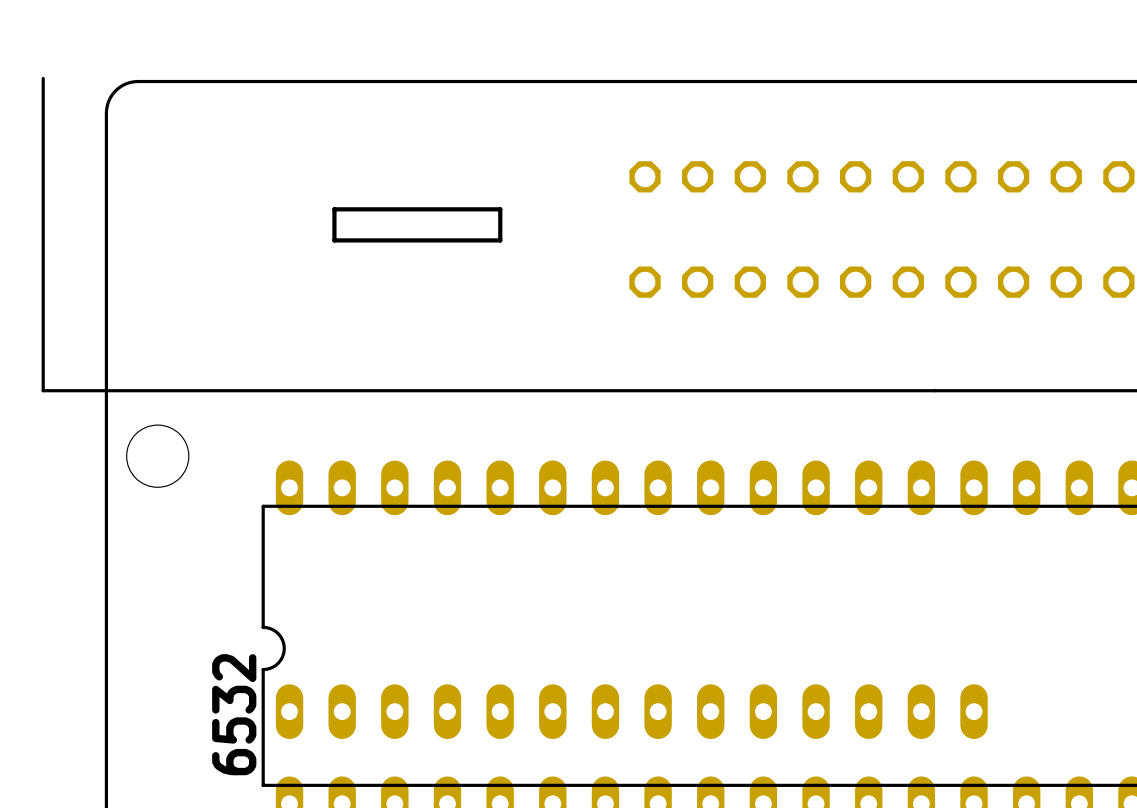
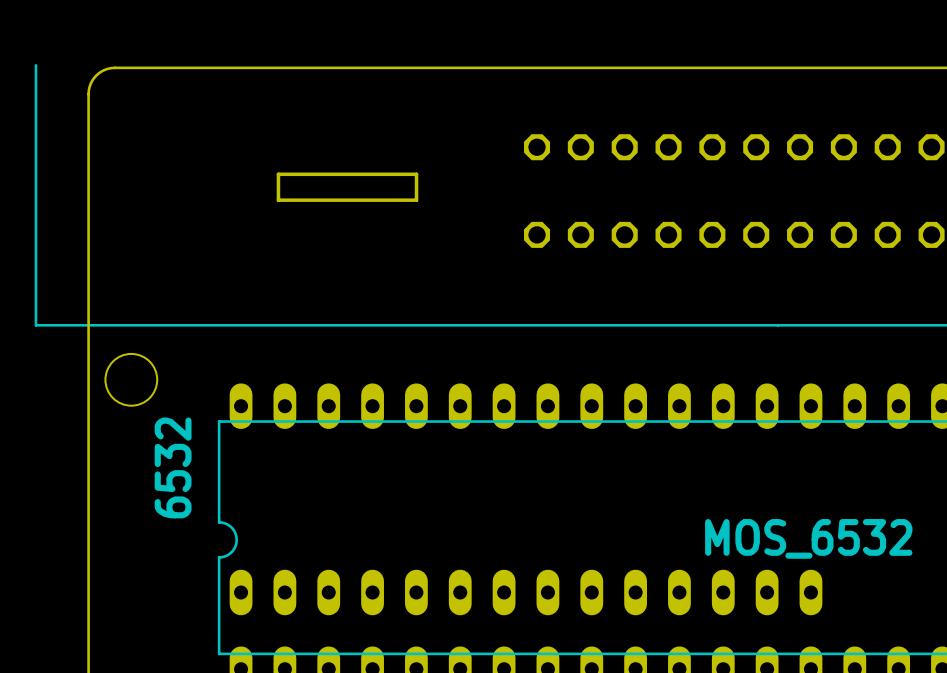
6532 value: none -> MOS_6532 (808, 538)
6532 name position: 6532 (234, 714) -> 6532 (173, 467)

